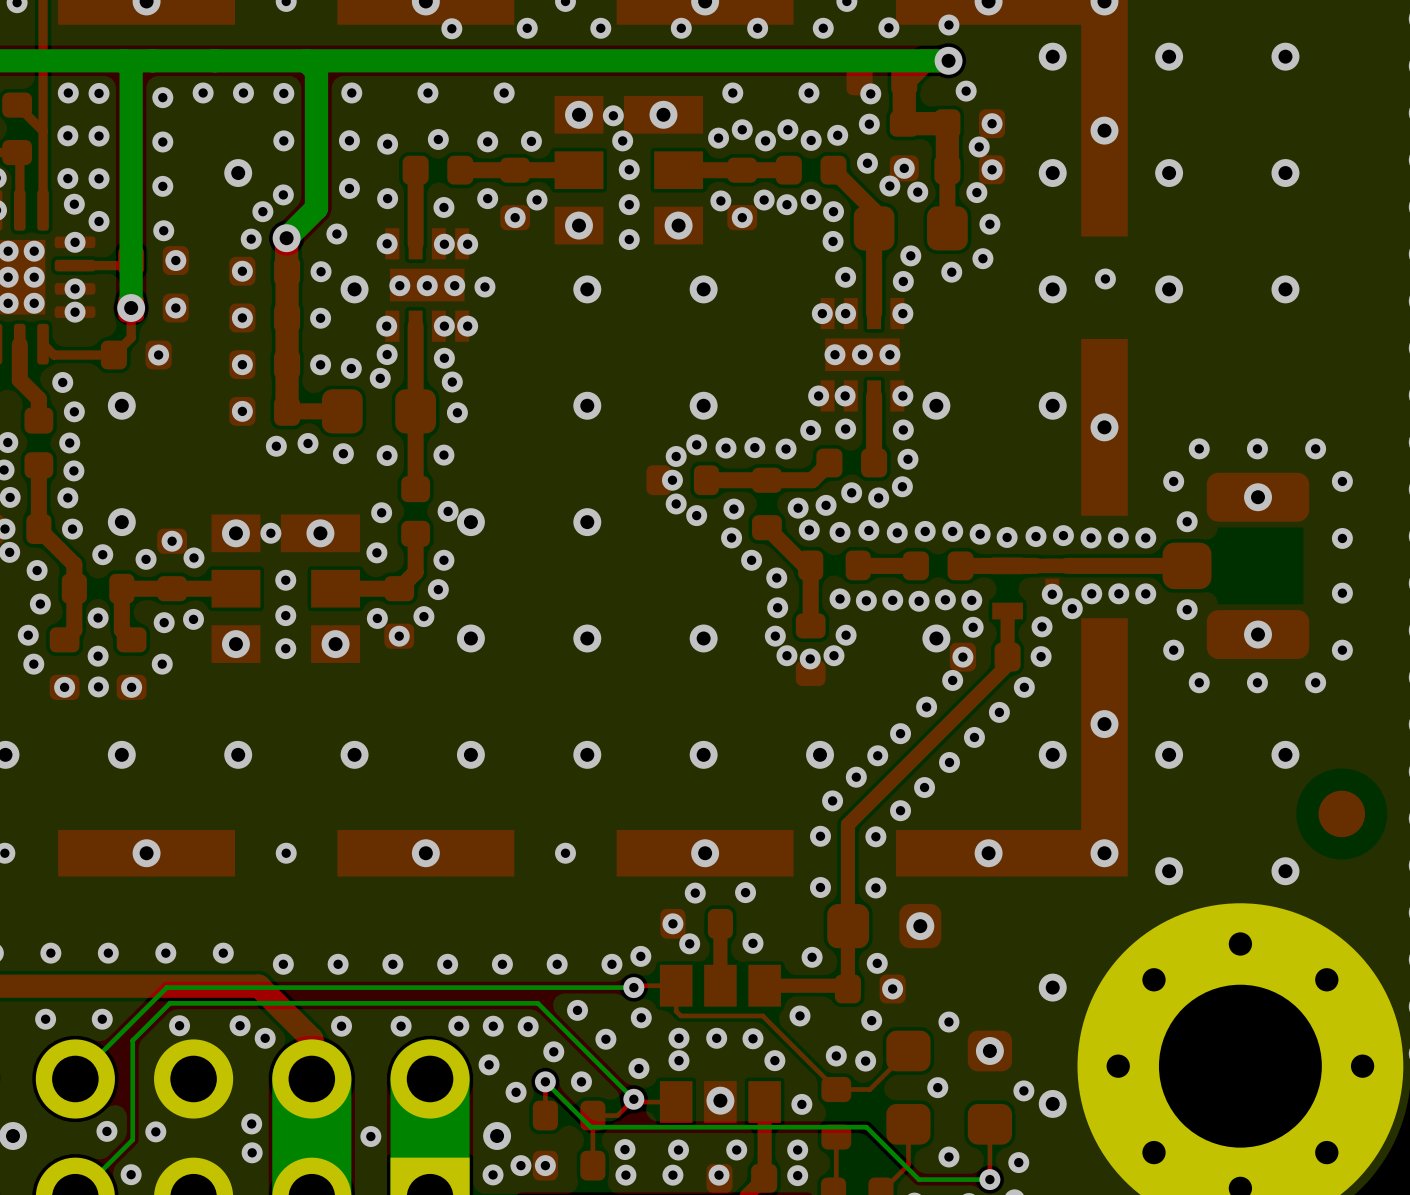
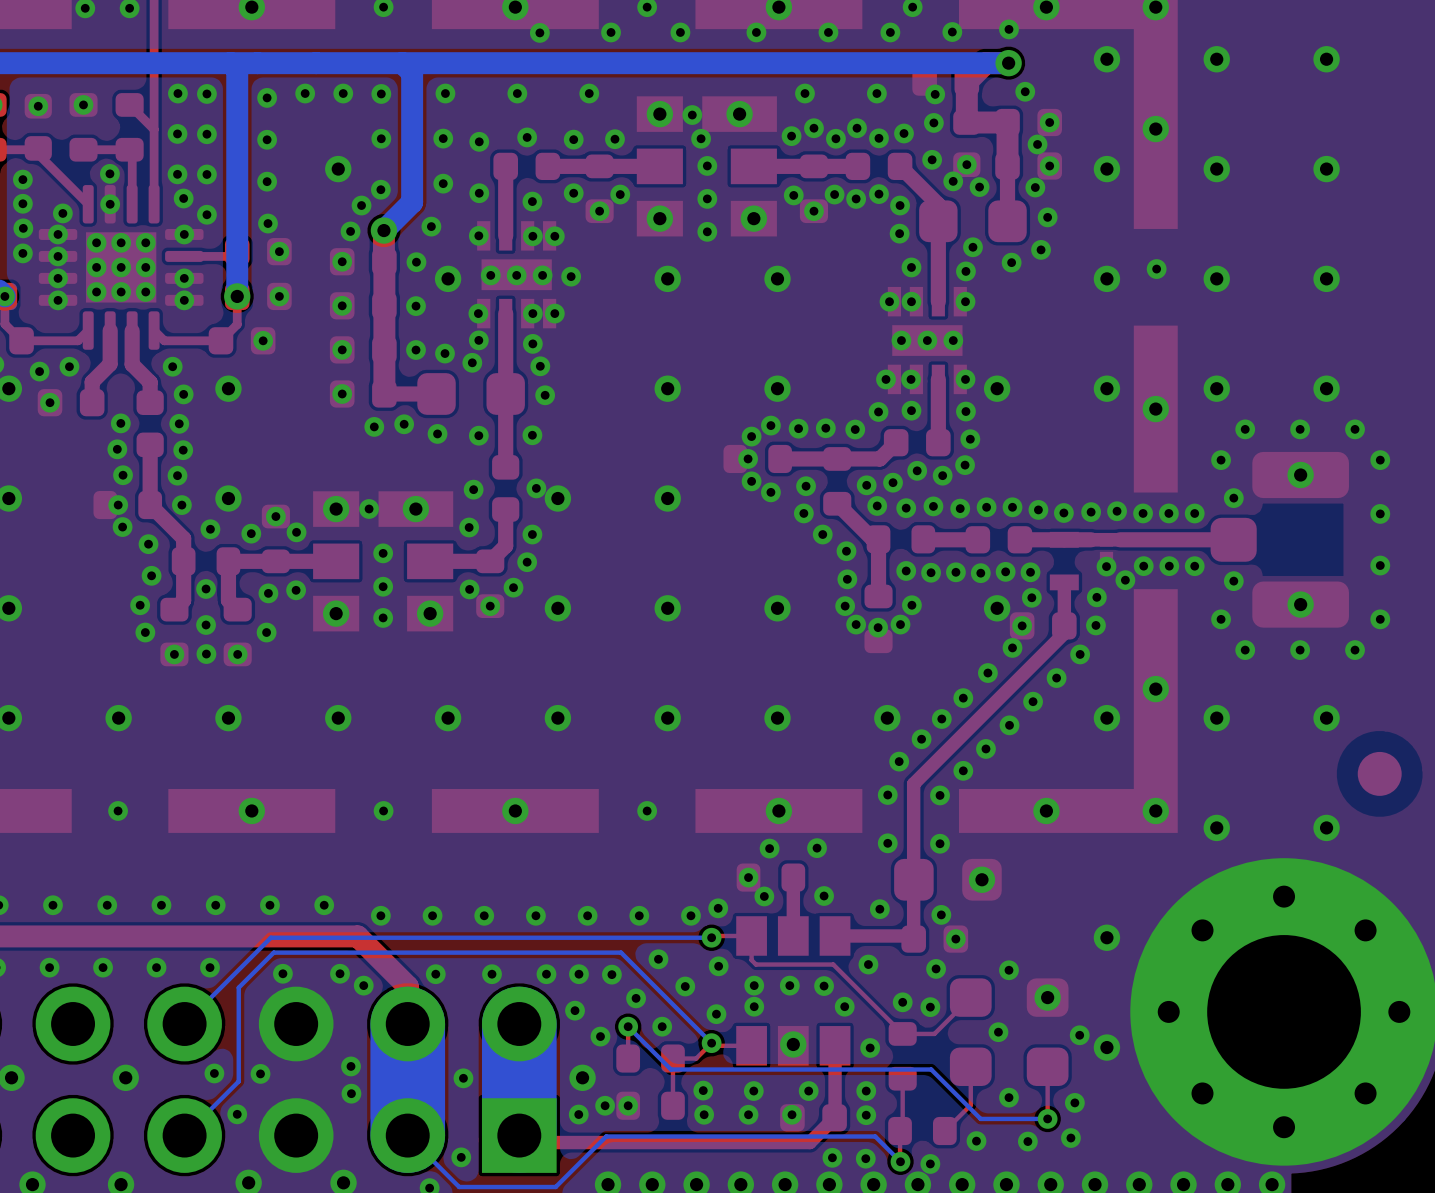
via: none -> (1216, 388)
via: none -> (1326, 388)

